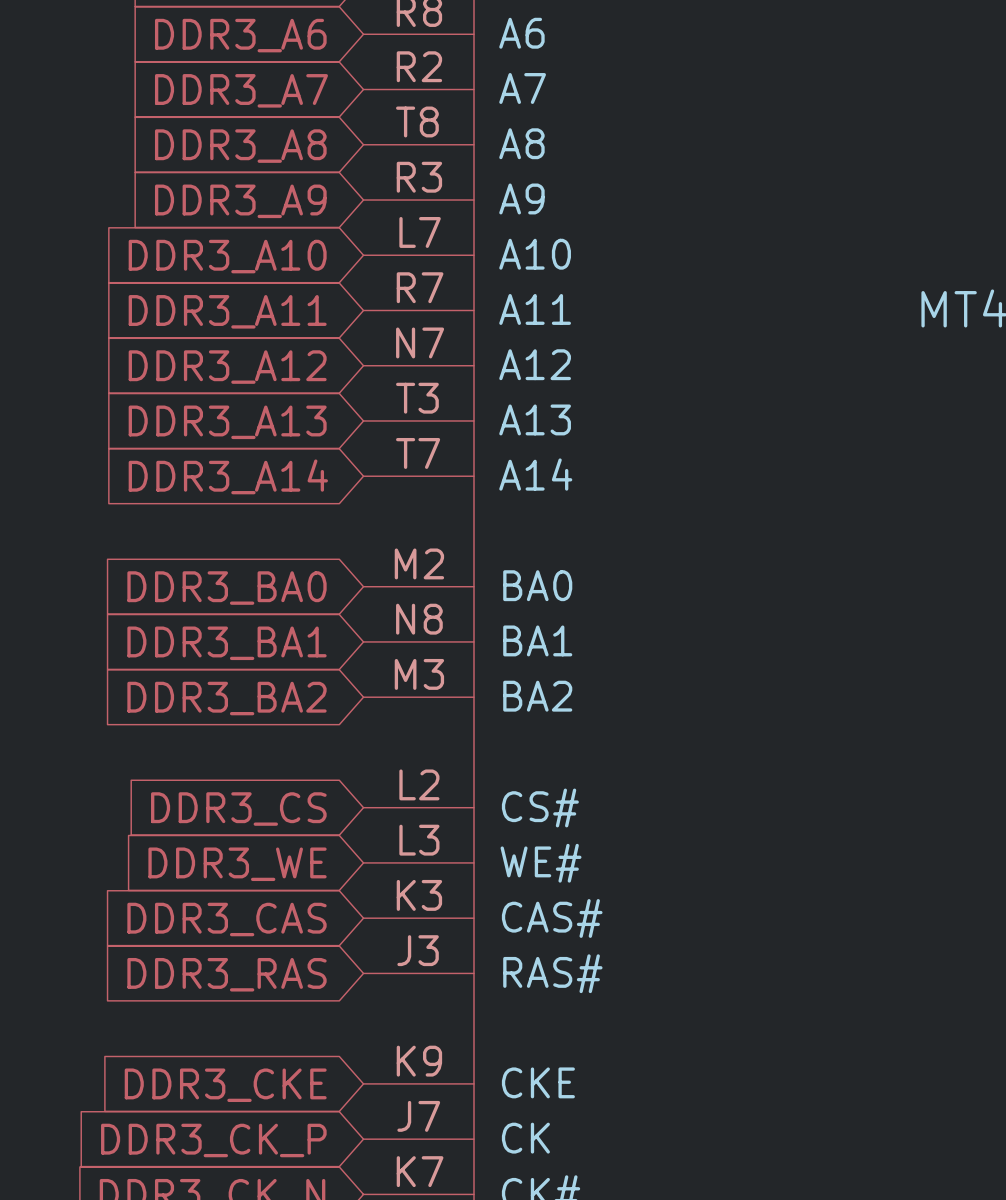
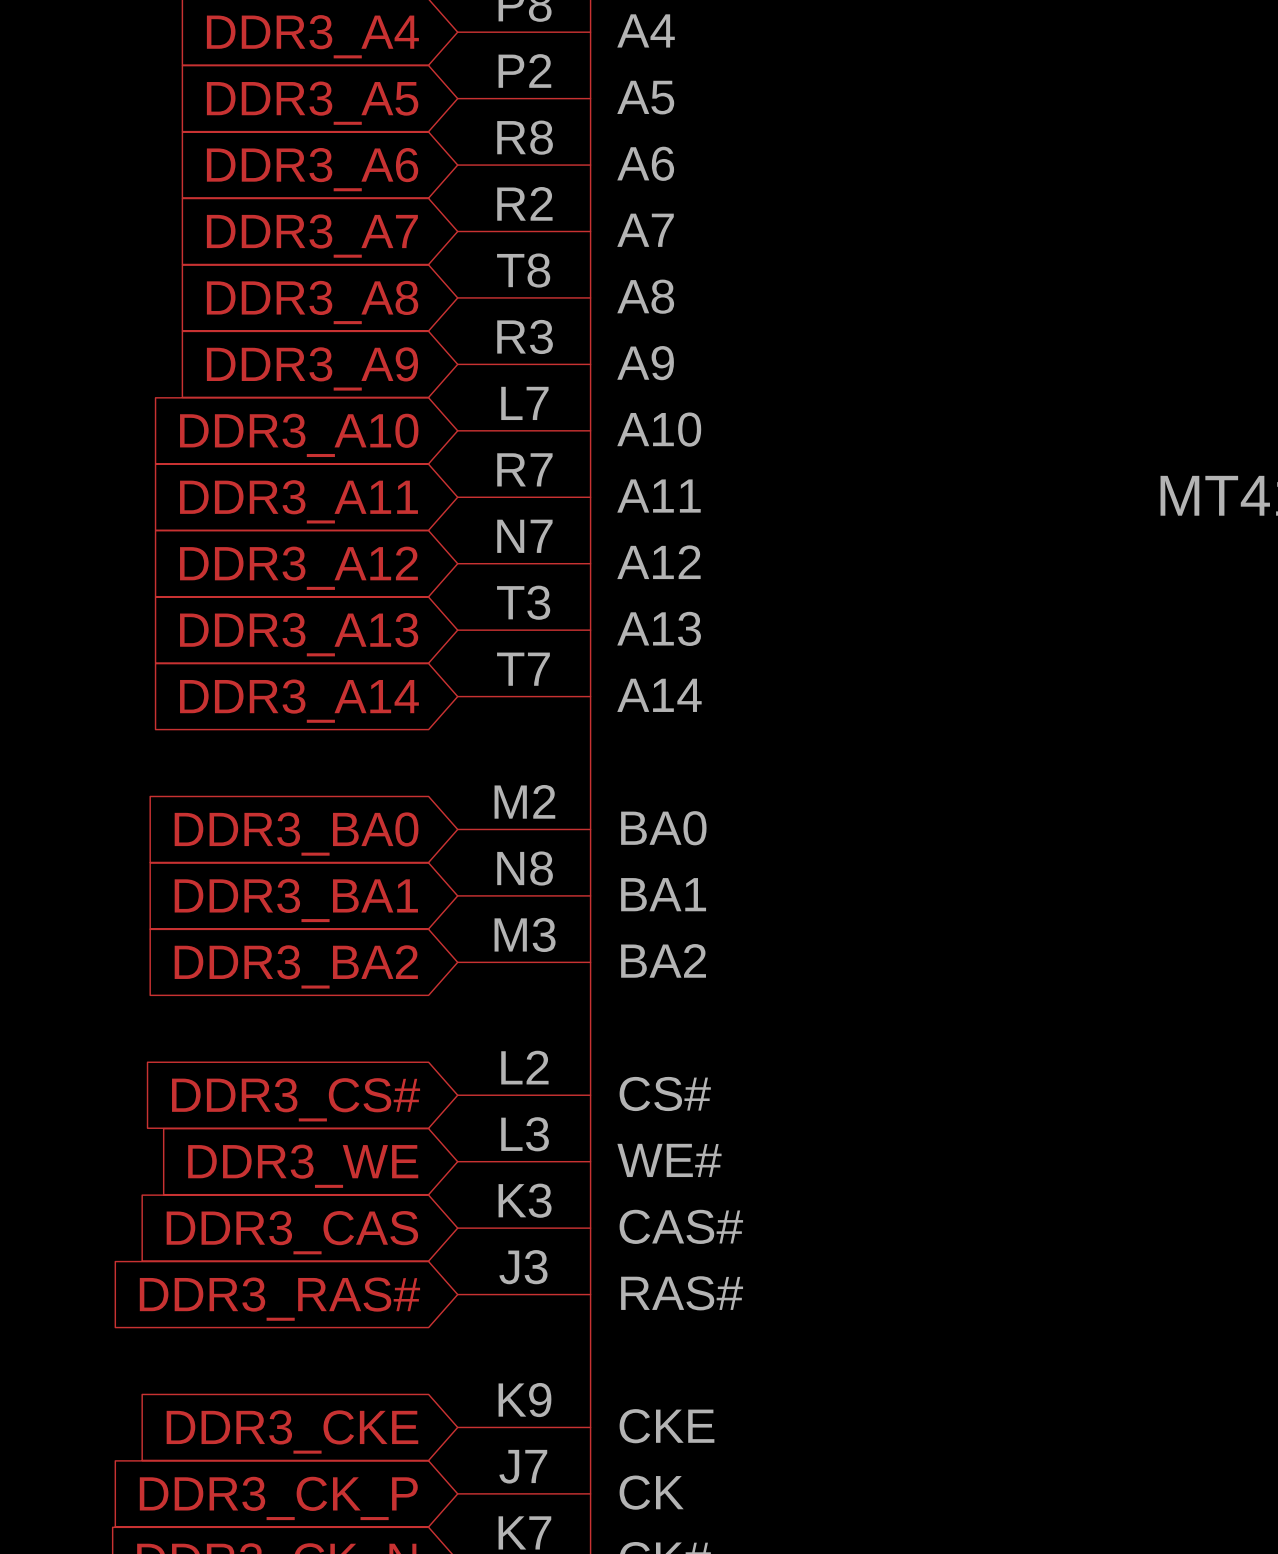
global label: DDR3_CS (238, 809) -> DDR3_CS# (296, 1099)
global label: DDR3_RAS (227, 974) -> DDR3_RAS# (279, 1299)

